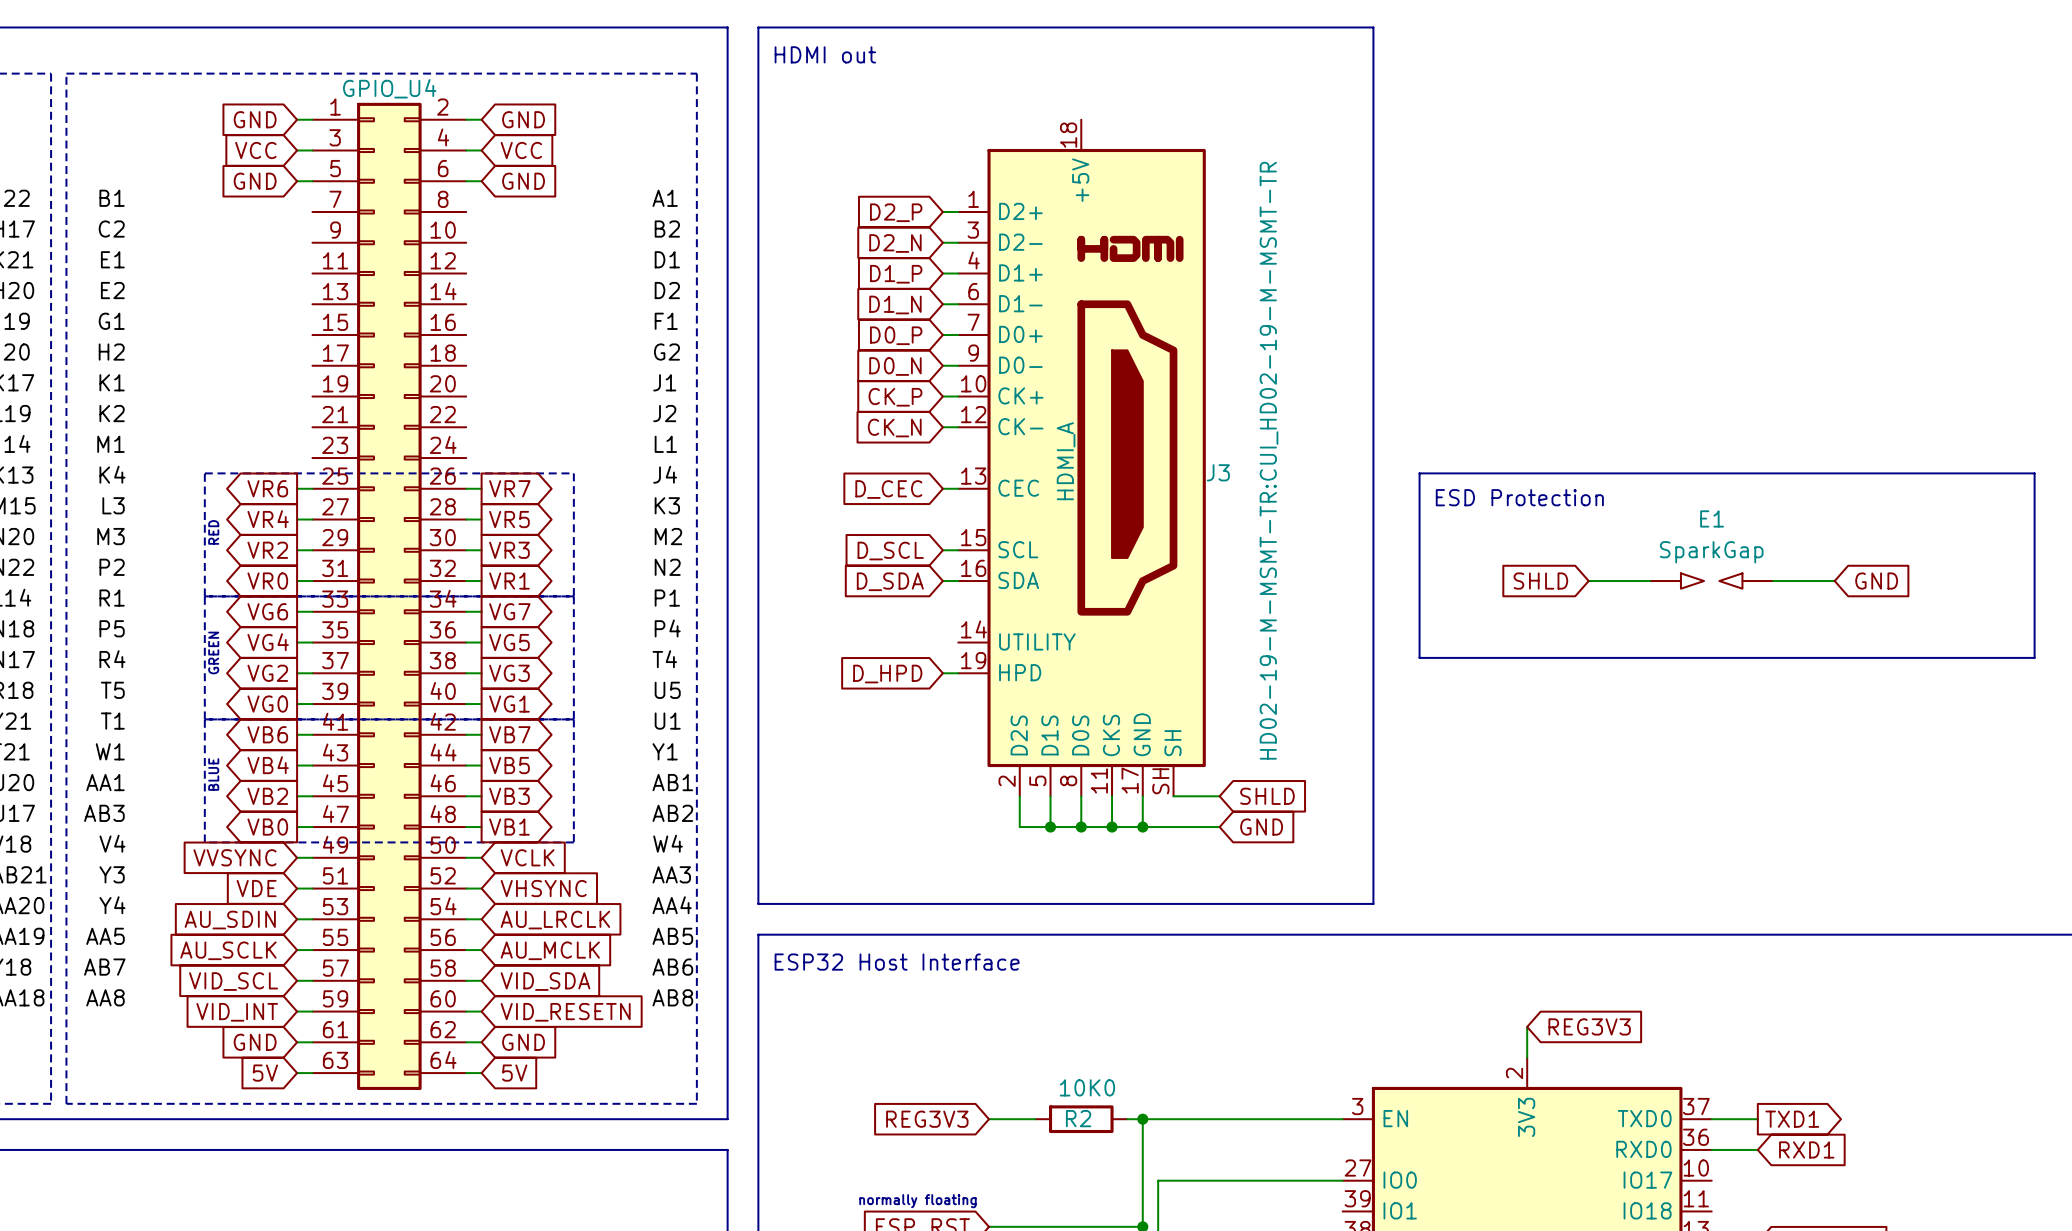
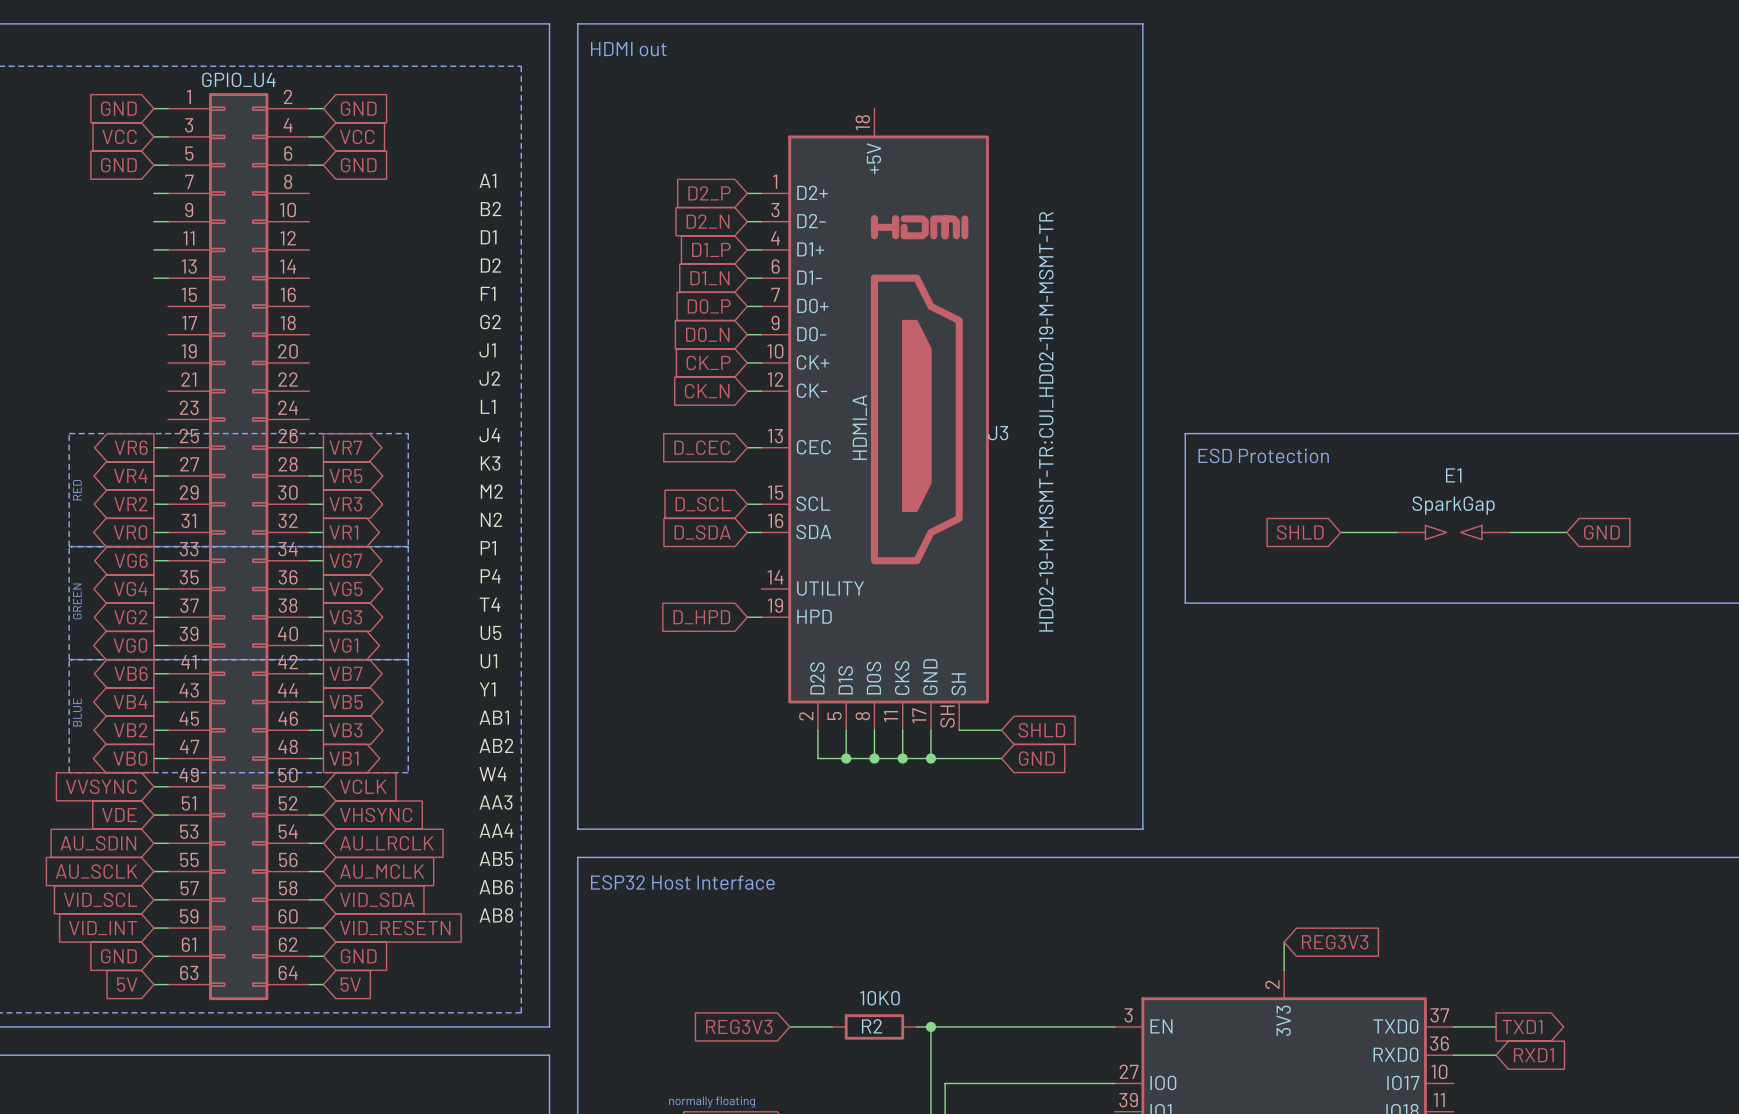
wire: none -> (153, 193) (168, 193)
wire: none -> (153, 221) (168, 221)
wire: none -> (153, 249) (168, 249)
wire: none -> (153, 278) (168, 278)

